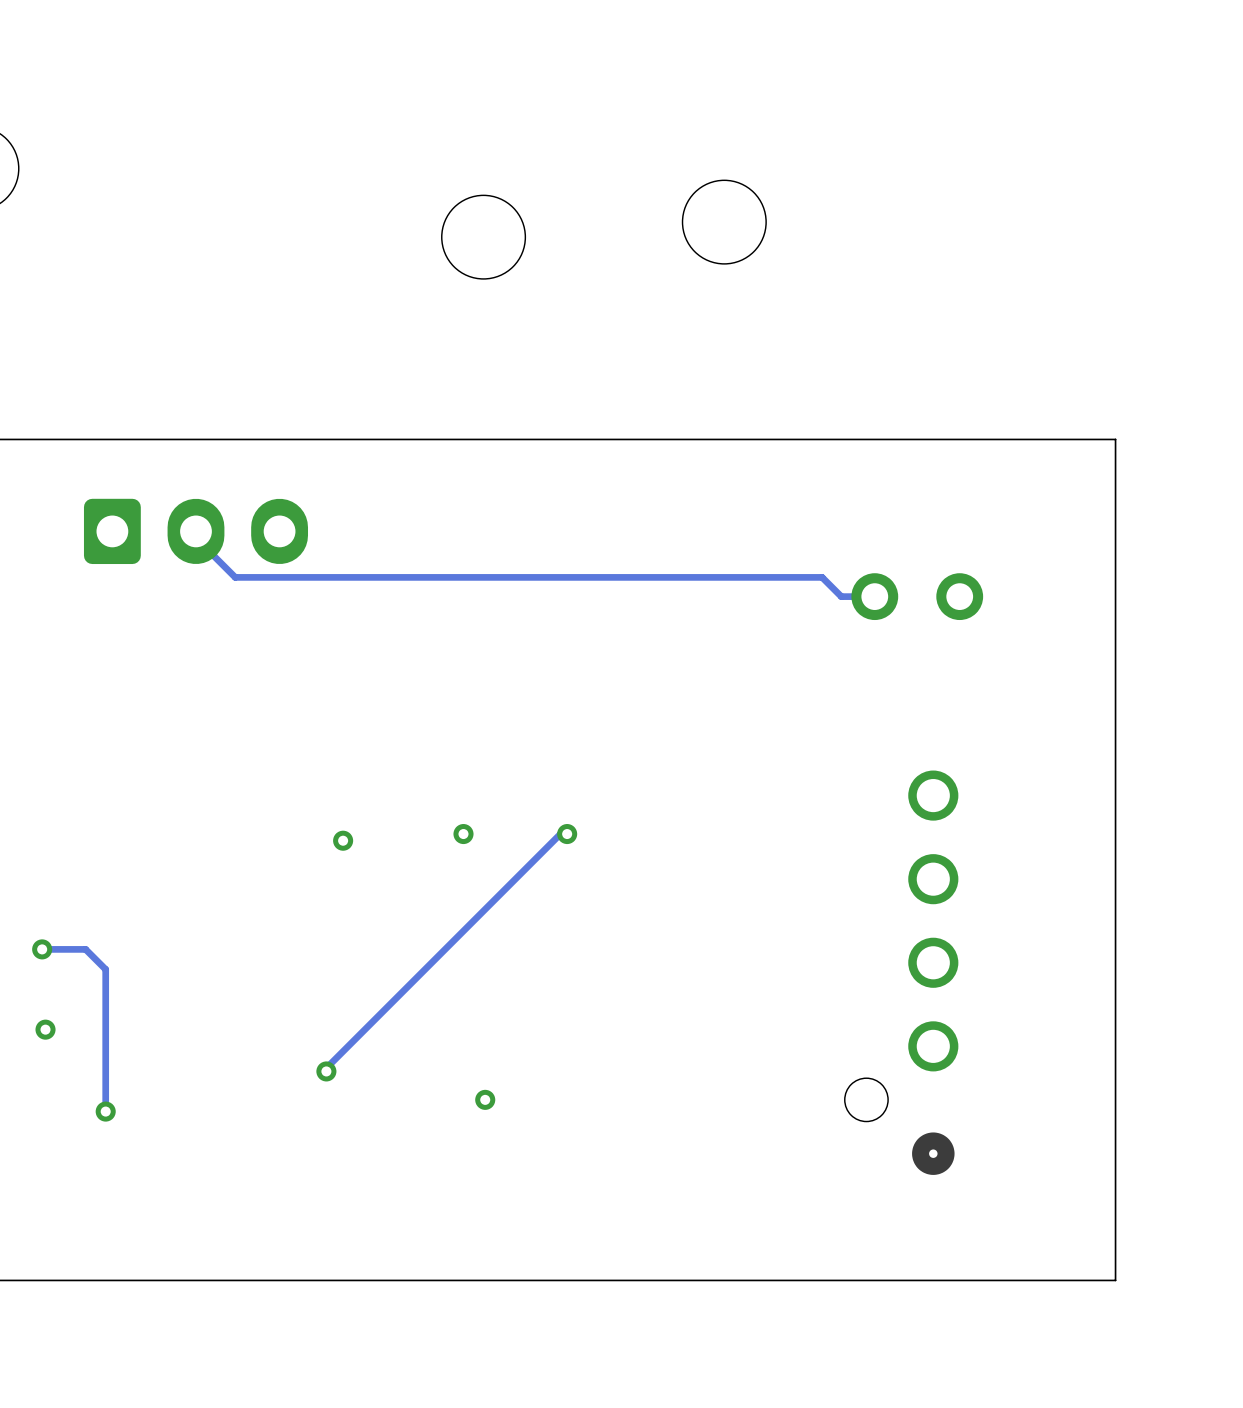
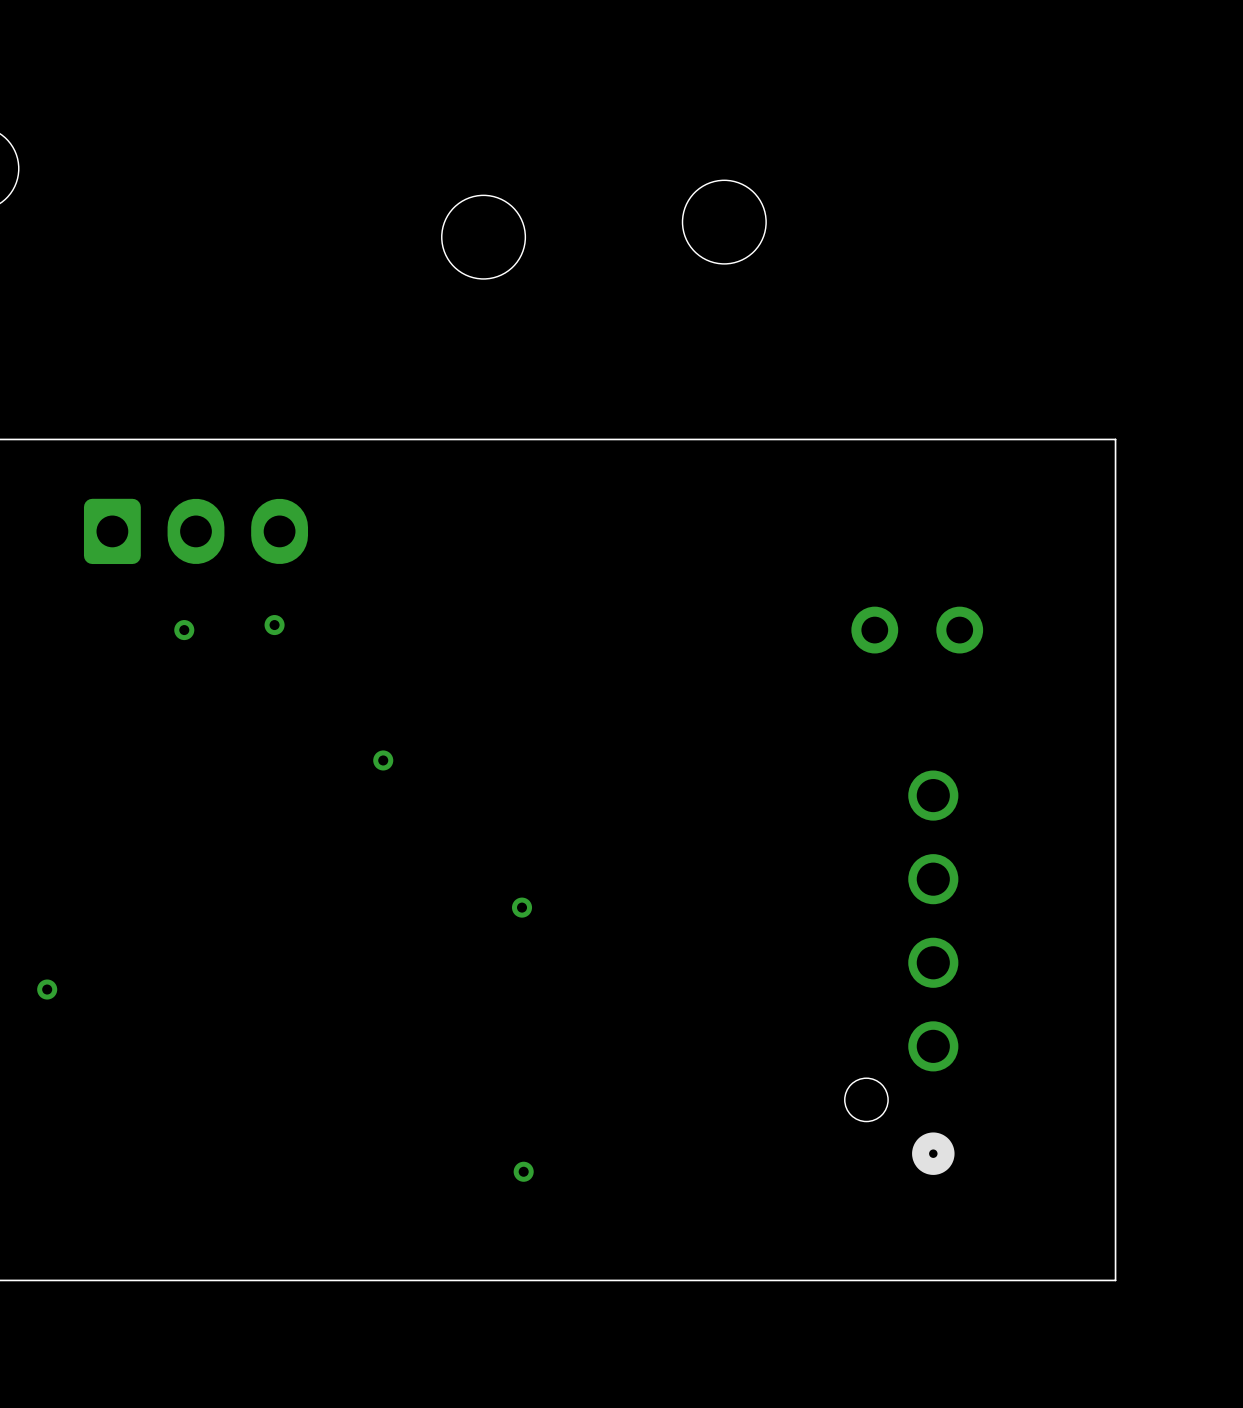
track: (192, 534) (235, 577) (822, 577) (841, 596) (874, 596) -> none
part position: (917, 596) -> (917, 630)
via: none -> (274, 625)
via: none -> (184, 630)
via: none -> (383, 760)
via: (463, 834) -> none
track: (567, 834) (560, 834) (326, 1068) (326, 1071) -> none
via: (567, 834) -> none
via: (343, 840) -> none
via: none -> (522, 907)
track: (42, 949) (85, 949) (105, 969) (105, 1111) -> none
via: (42, 949) -> none
via: none -> (47, 989)
via: (45, 1029) -> none
via: (326, 1071) -> none
via position: (485, 1099) -> (523, 1171)
via: (105, 1111) -> none

